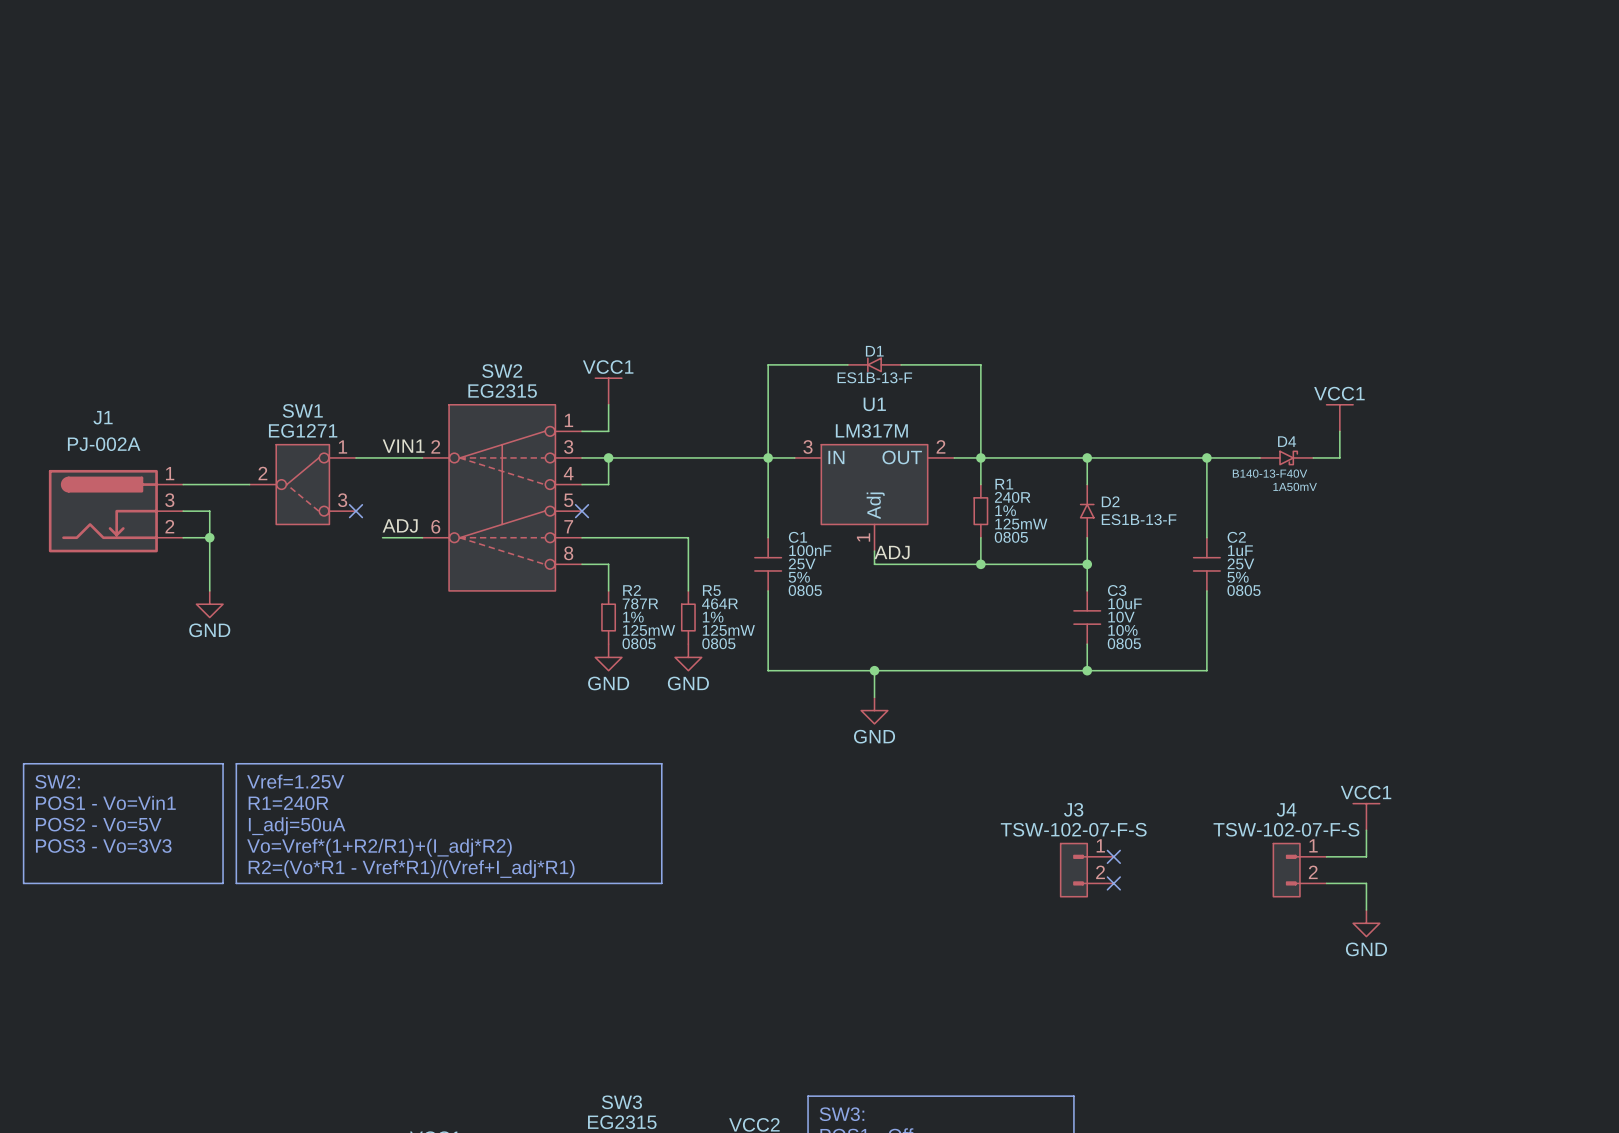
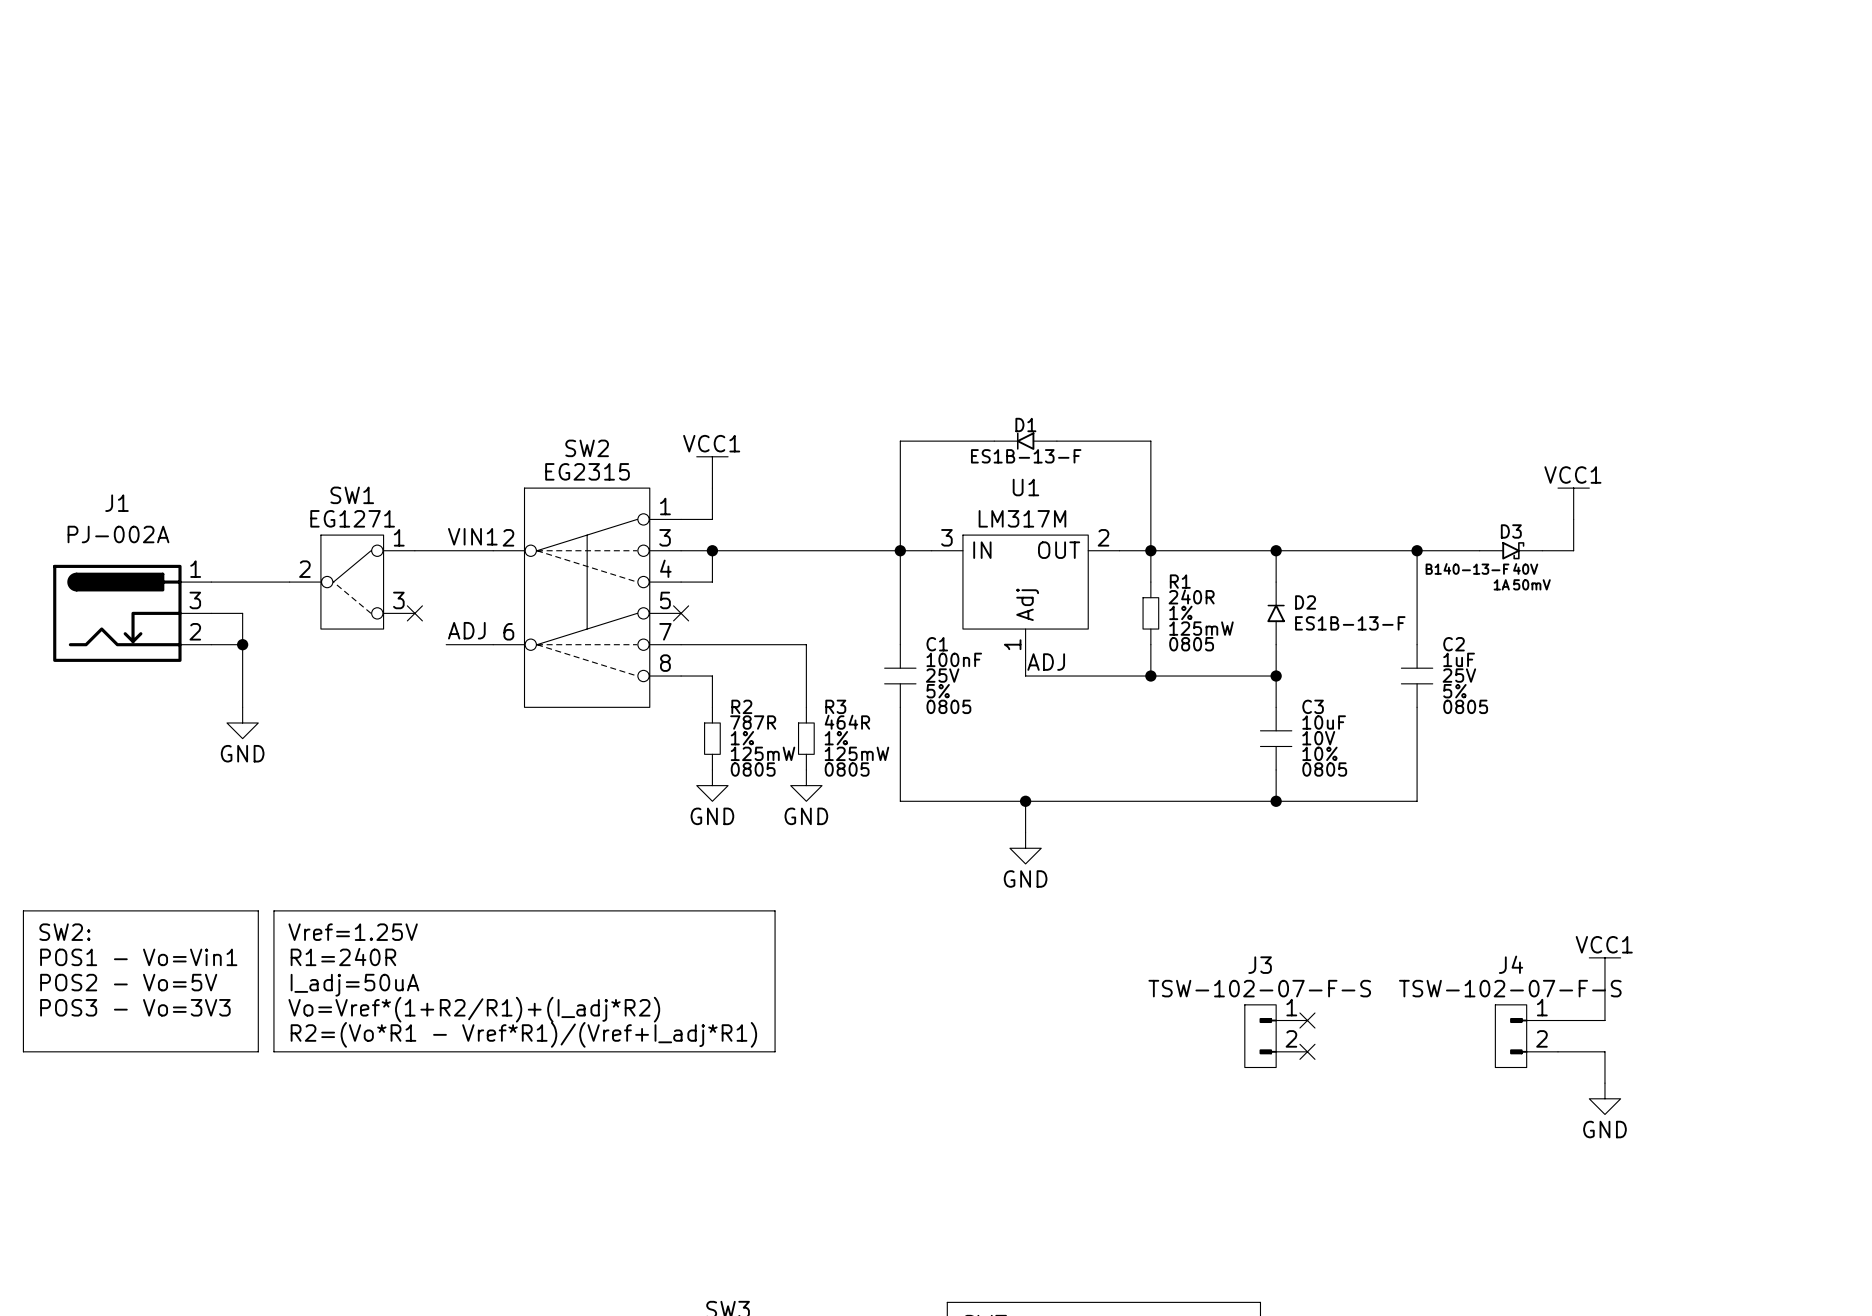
D4 name: D4 (1287, 441) -> D3 (1511, 531)
R5 name: R5 (711, 590) -> R3 (835, 706)

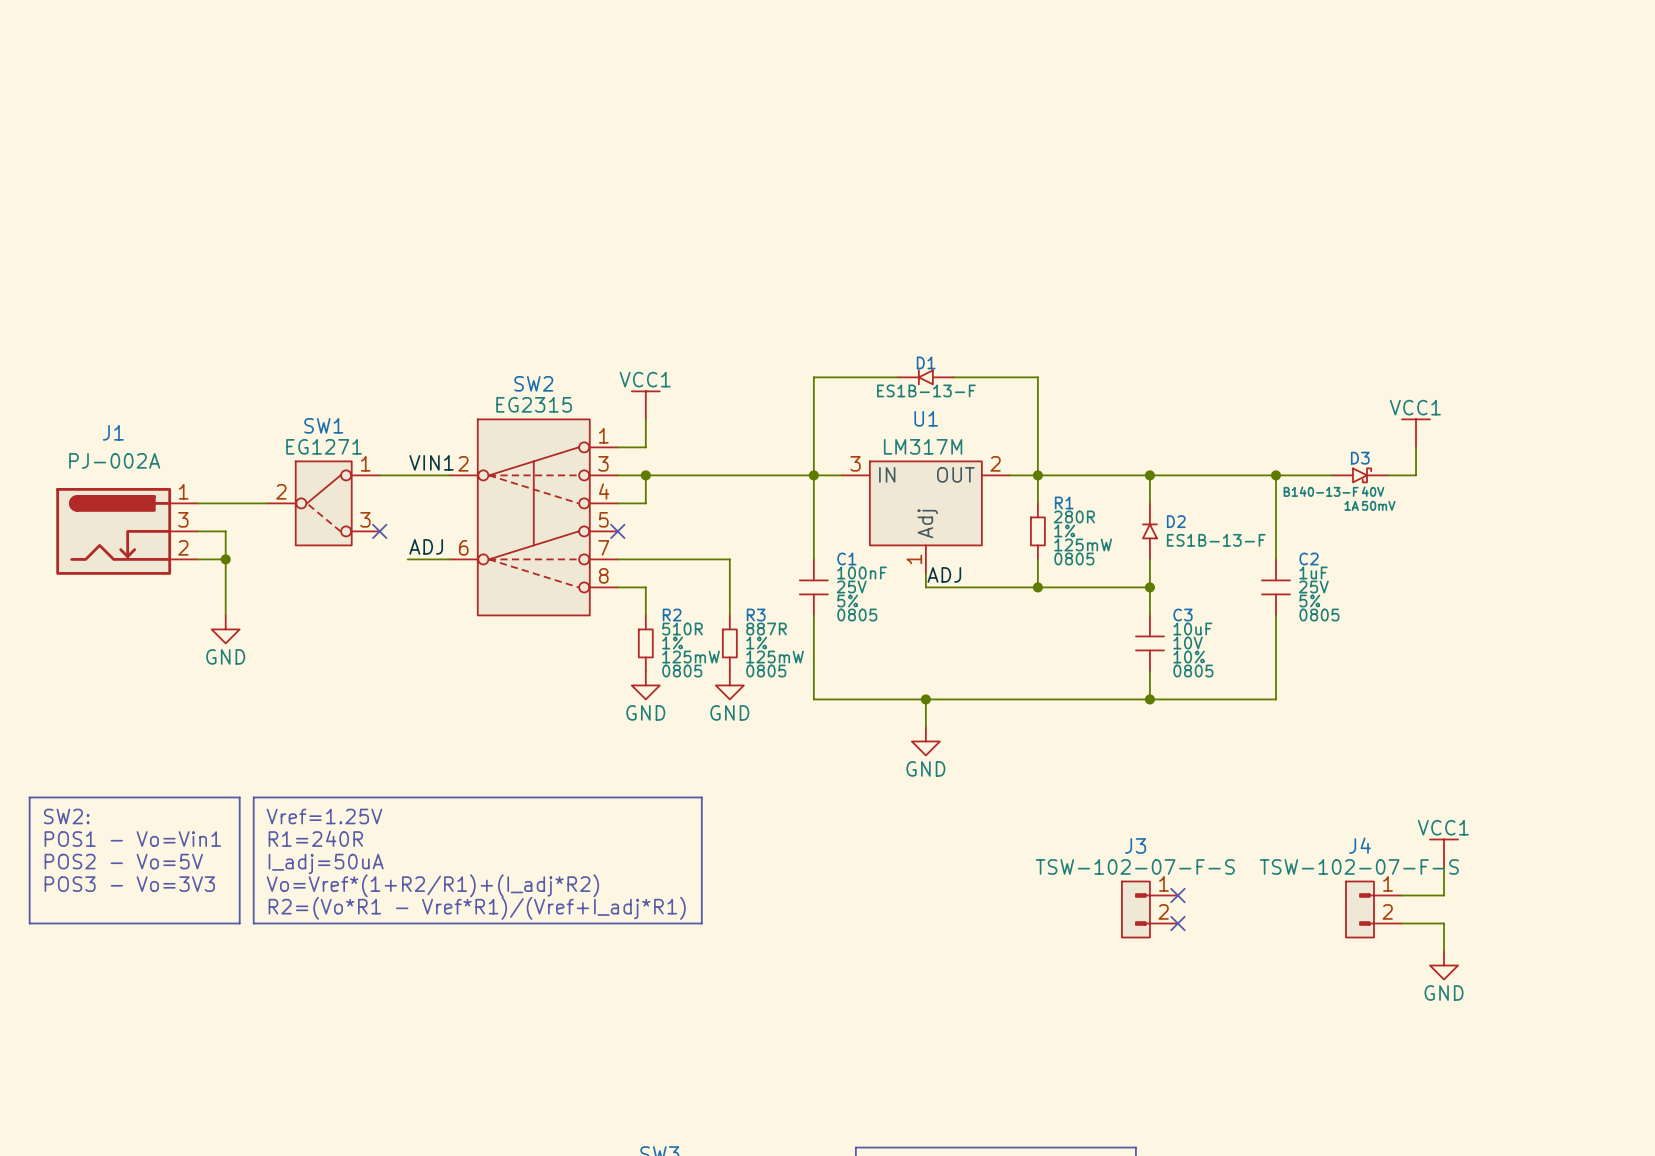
R1 value: 240R (1191, 596) -> 280R (1074, 516)
R2 value: 787R (753, 722) -> 510R (682, 629)
R3 value: 464R (847, 722) -> 887R (766, 629)

